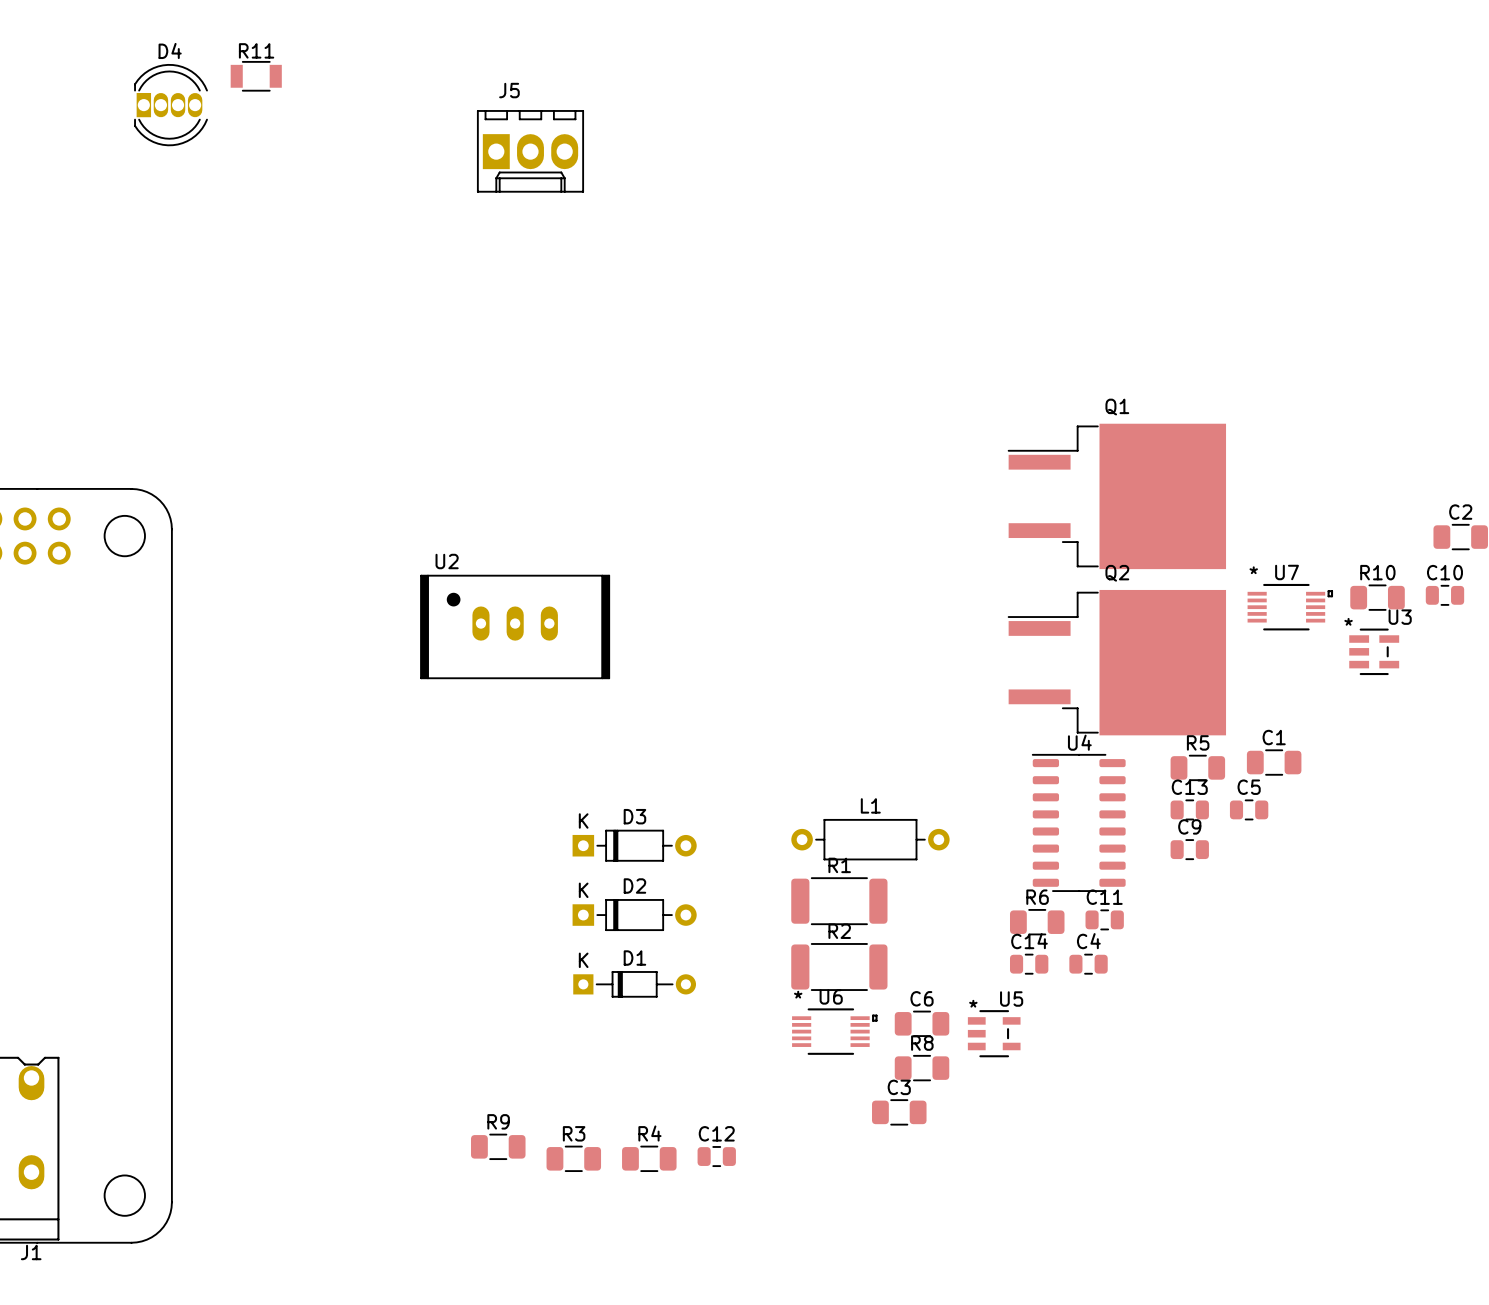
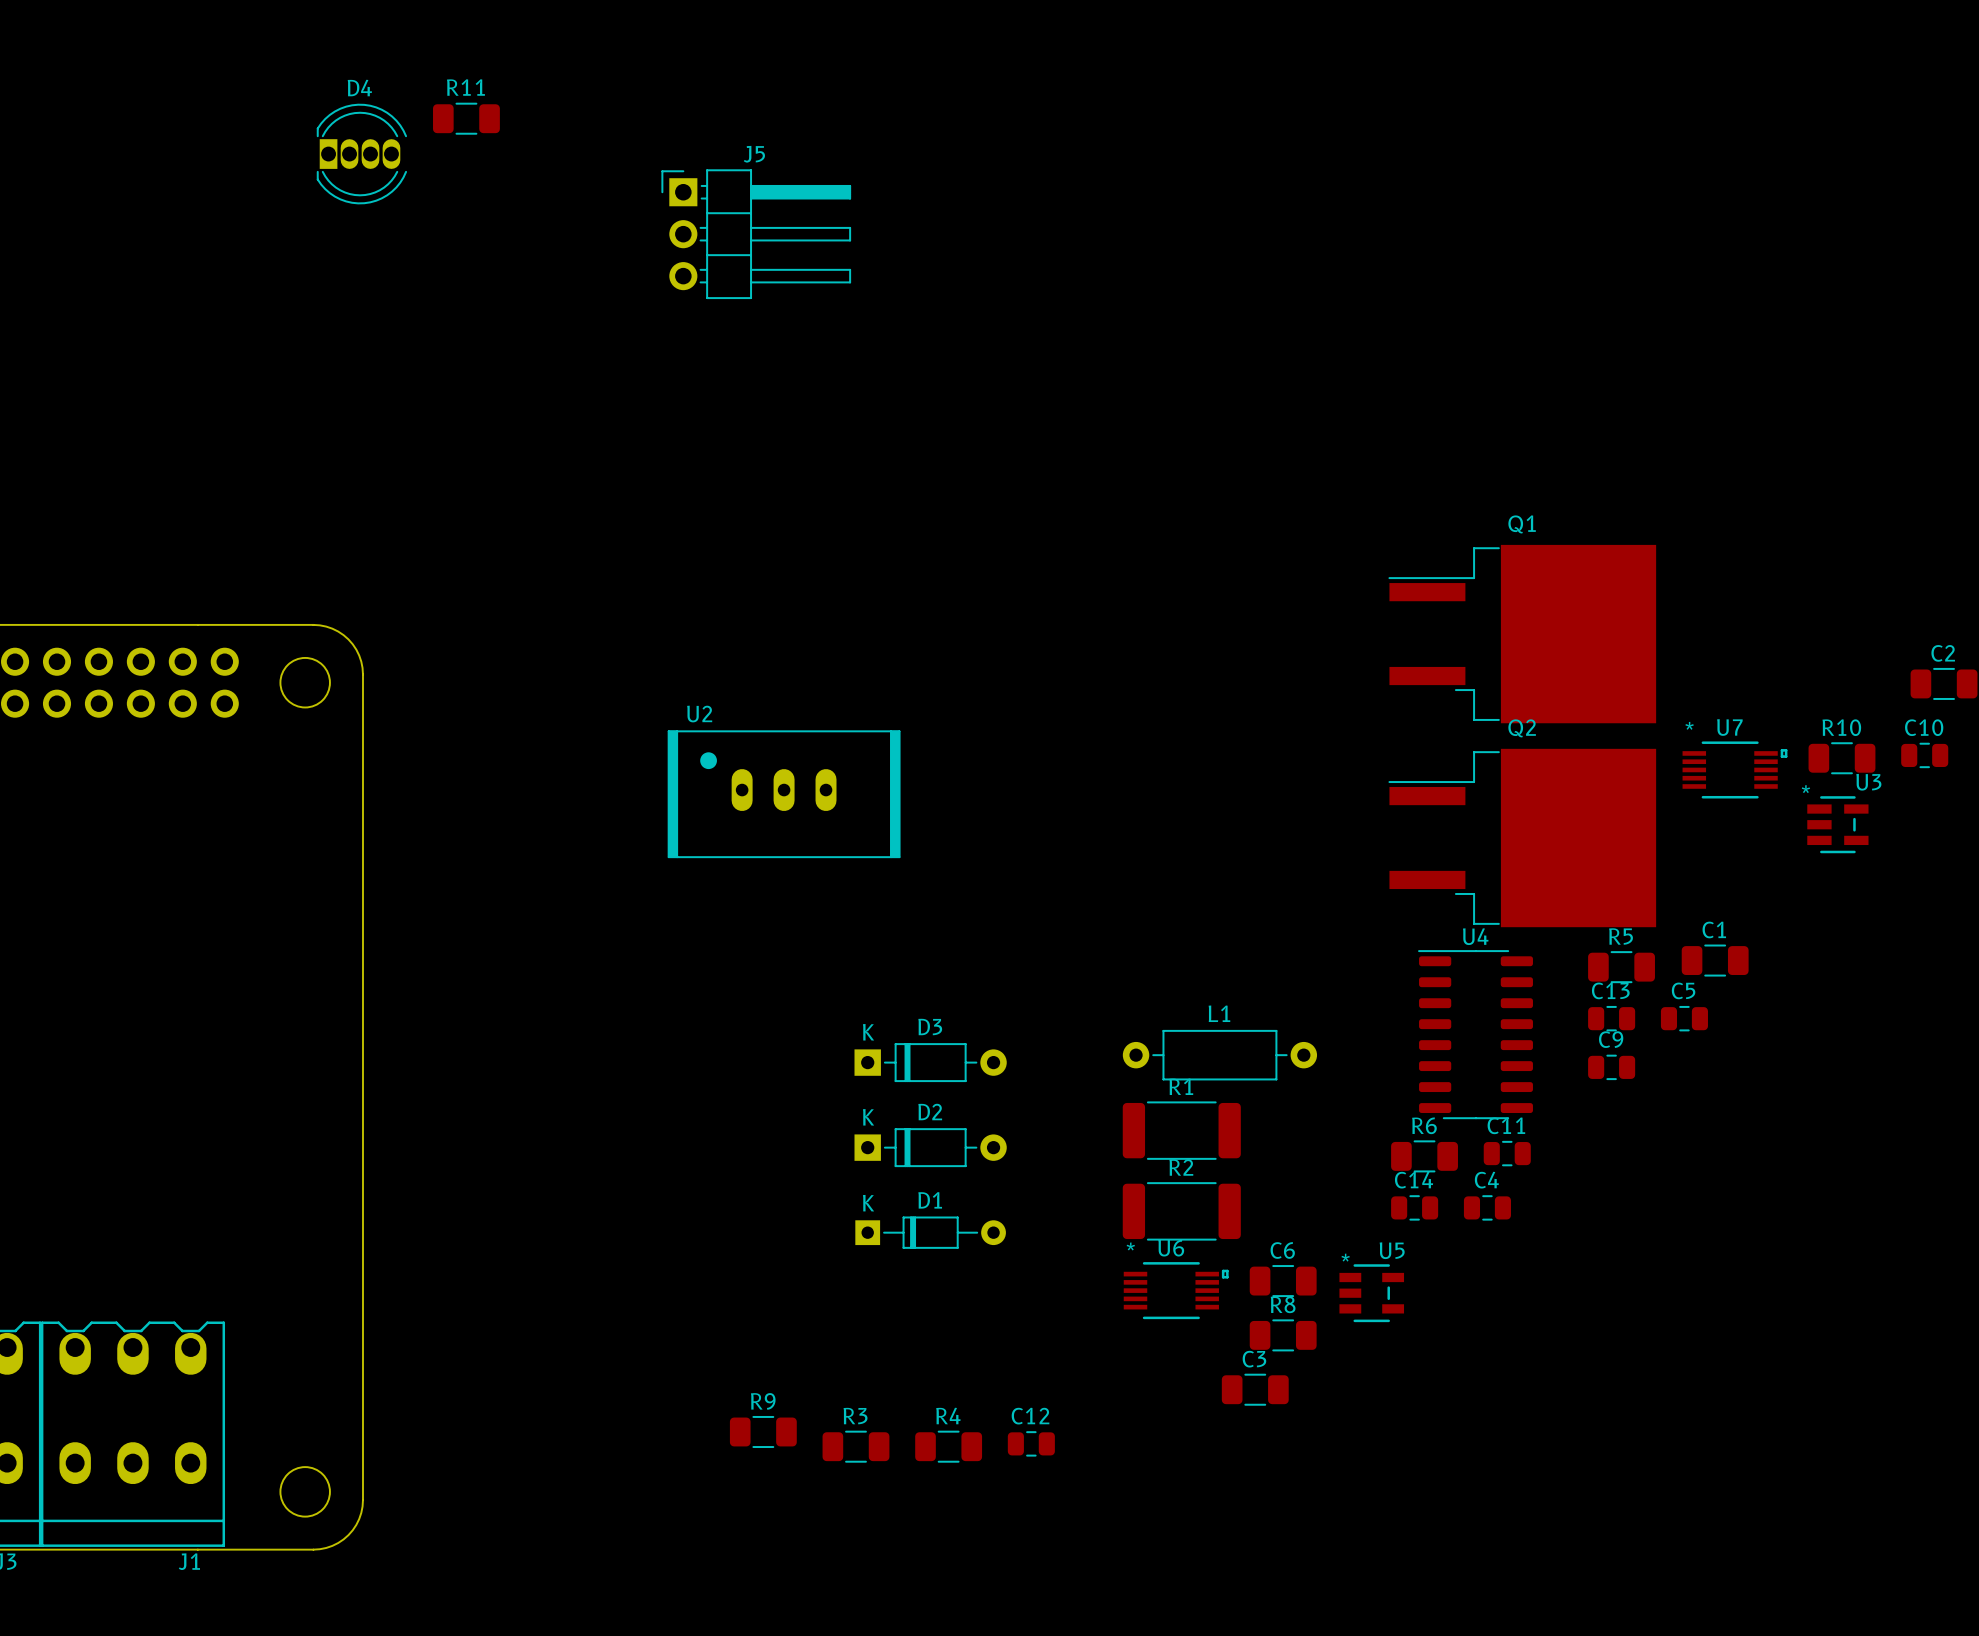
R11 footprint: [230, 61, 282, 92] -> [433, 102, 500, 135]
J5 footprint: [477, 110, 584, 193] -> [661, 169, 852, 300]

